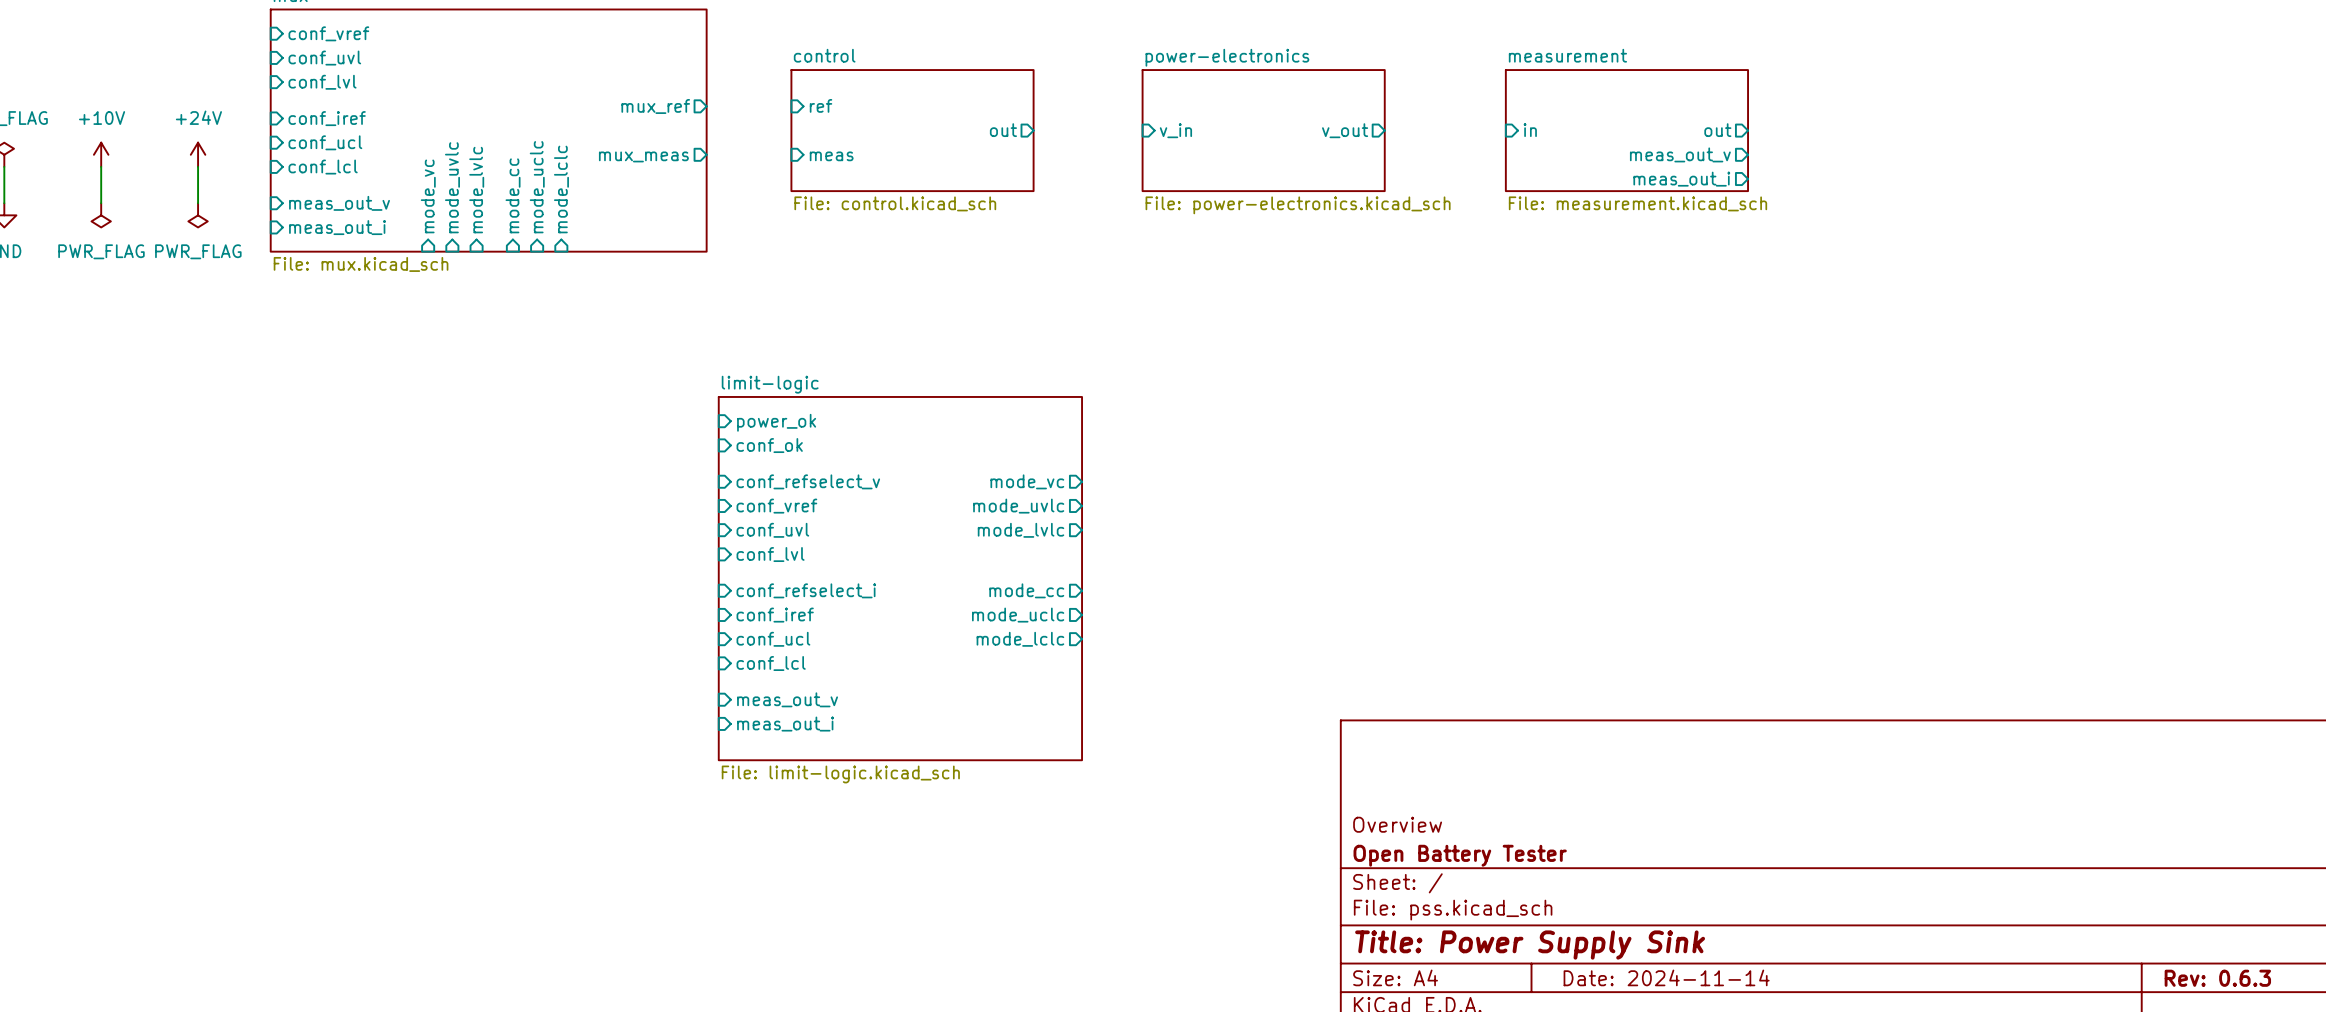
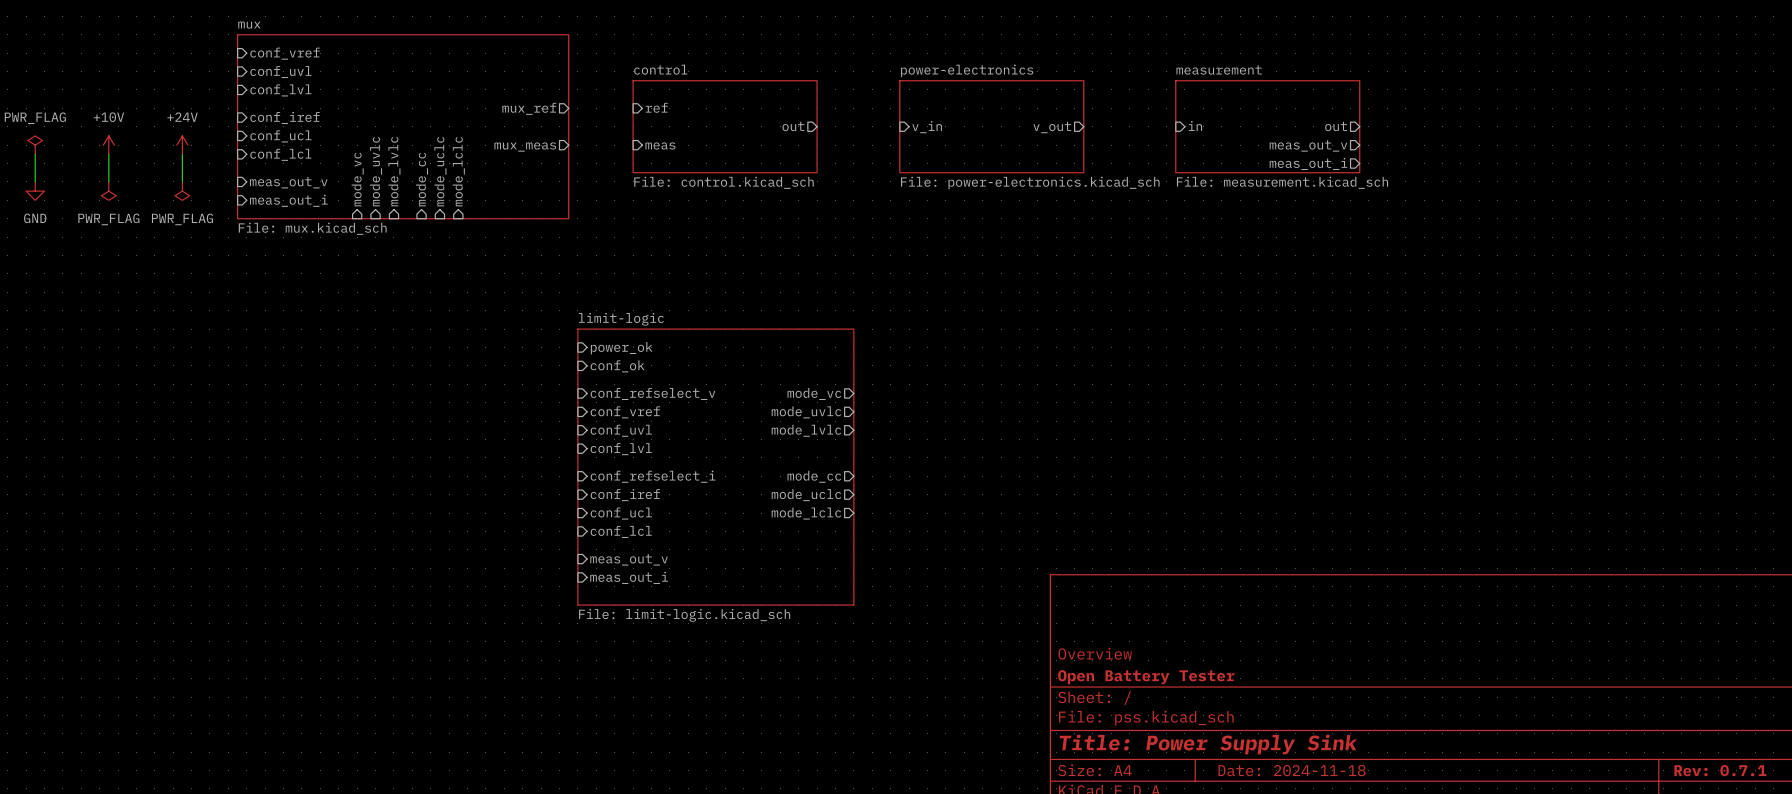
title block: Date: 2024-11-14 (1666, 977) -> Date: 2024-11-18 (1292, 770)
title block: Rev: 0.6.3 (2217, 978) -> Rev: 0.7.1 (1720, 770)

